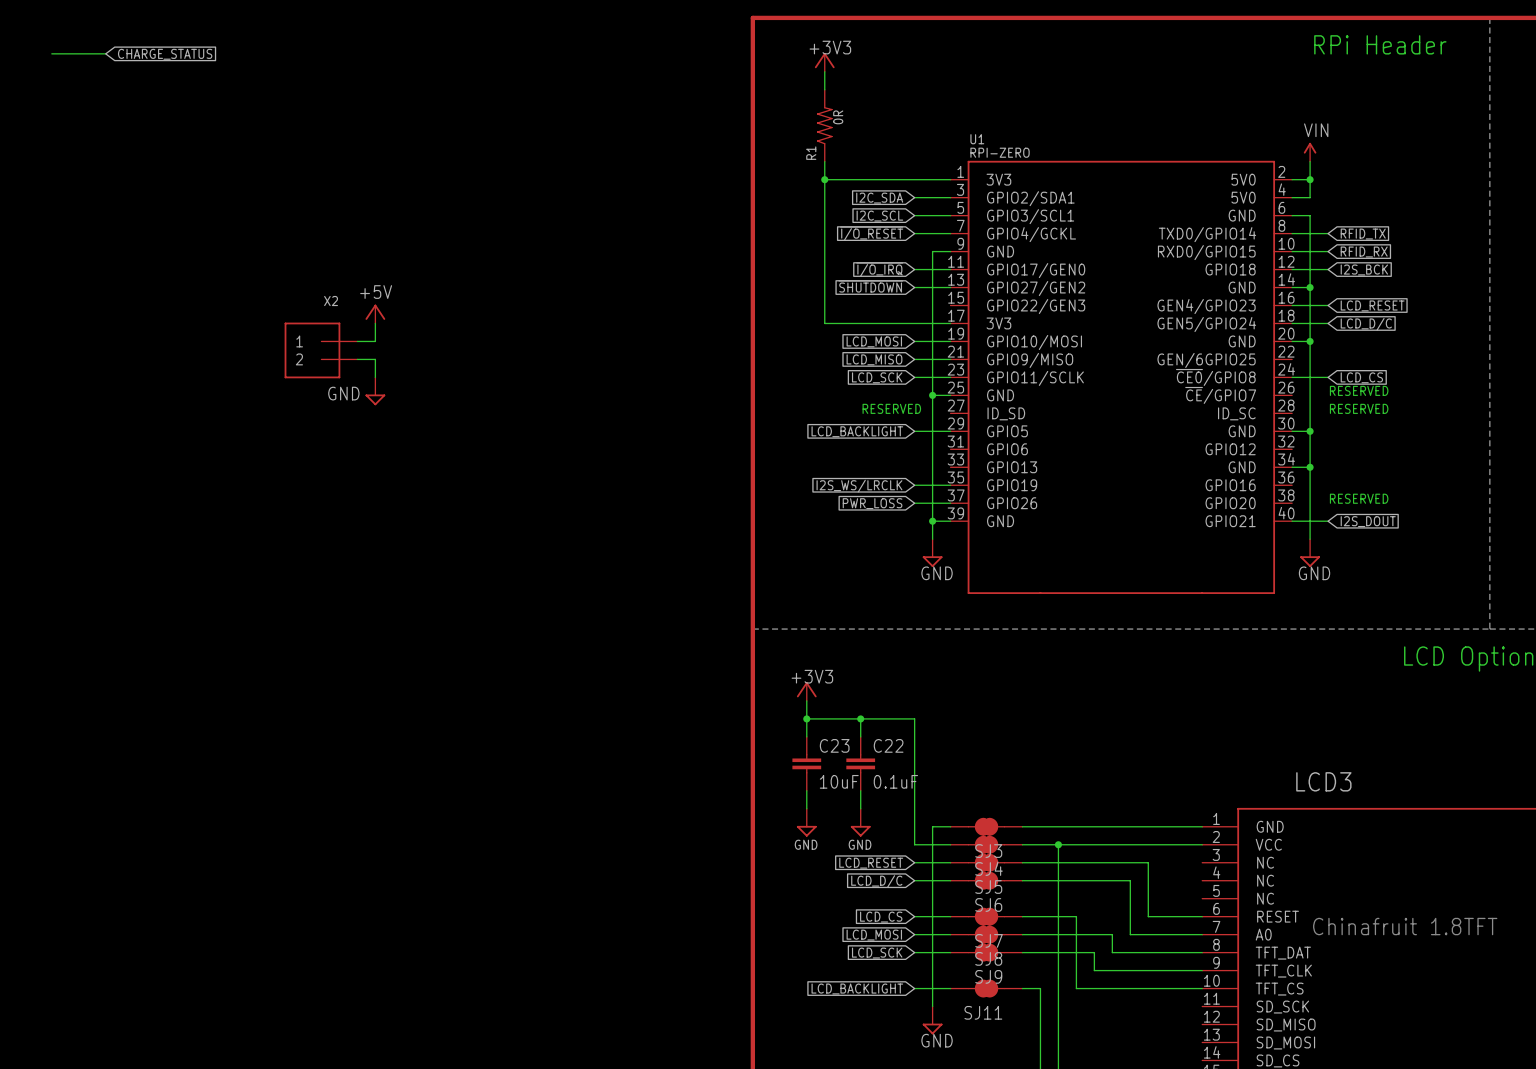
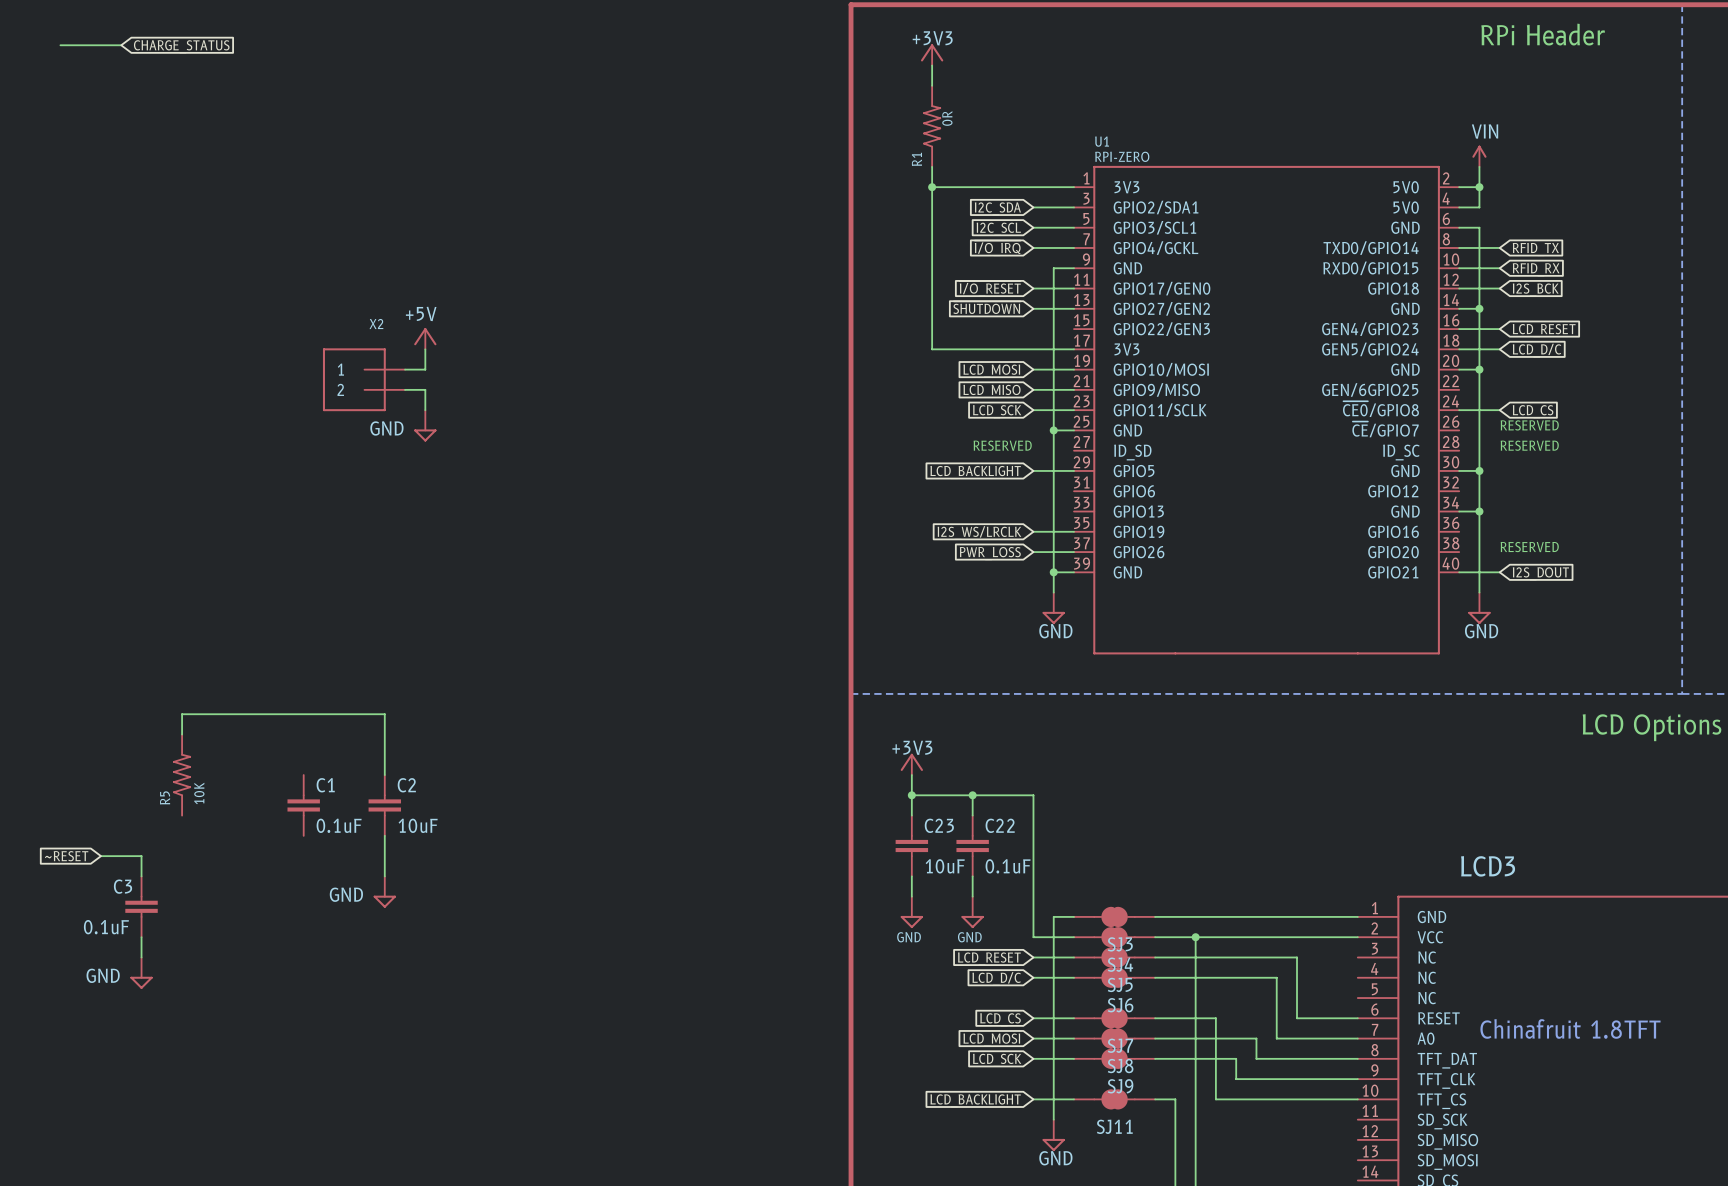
global label: ~{I/O_RESET} (871, 233) -> ~{I/O_IRQ} (997, 248)
global label: ~{I/O_IRQ} (879, 269) -> ~{I/O_RESET} (990, 288)
wire: none -> (182, 734) (182, 714) (384, 714) (384, 775)
R5: none -> 10K (182, 775)
C1: none -> 0.1uF (303, 805)
C2: none -> 10uF (384, 805)
wire: none -> (384, 835) (384, 876)
global label: none -> ~RESET (66, 856)
wire: none -> (100, 856) (141, 856) (141, 876)
power symbol: none -> GND (384, 892)
C3: none -> 0.1uF (141, 906)
wire: none -> (141, 937) (141, 957)
power symbol: none -> GND (141, 973)

